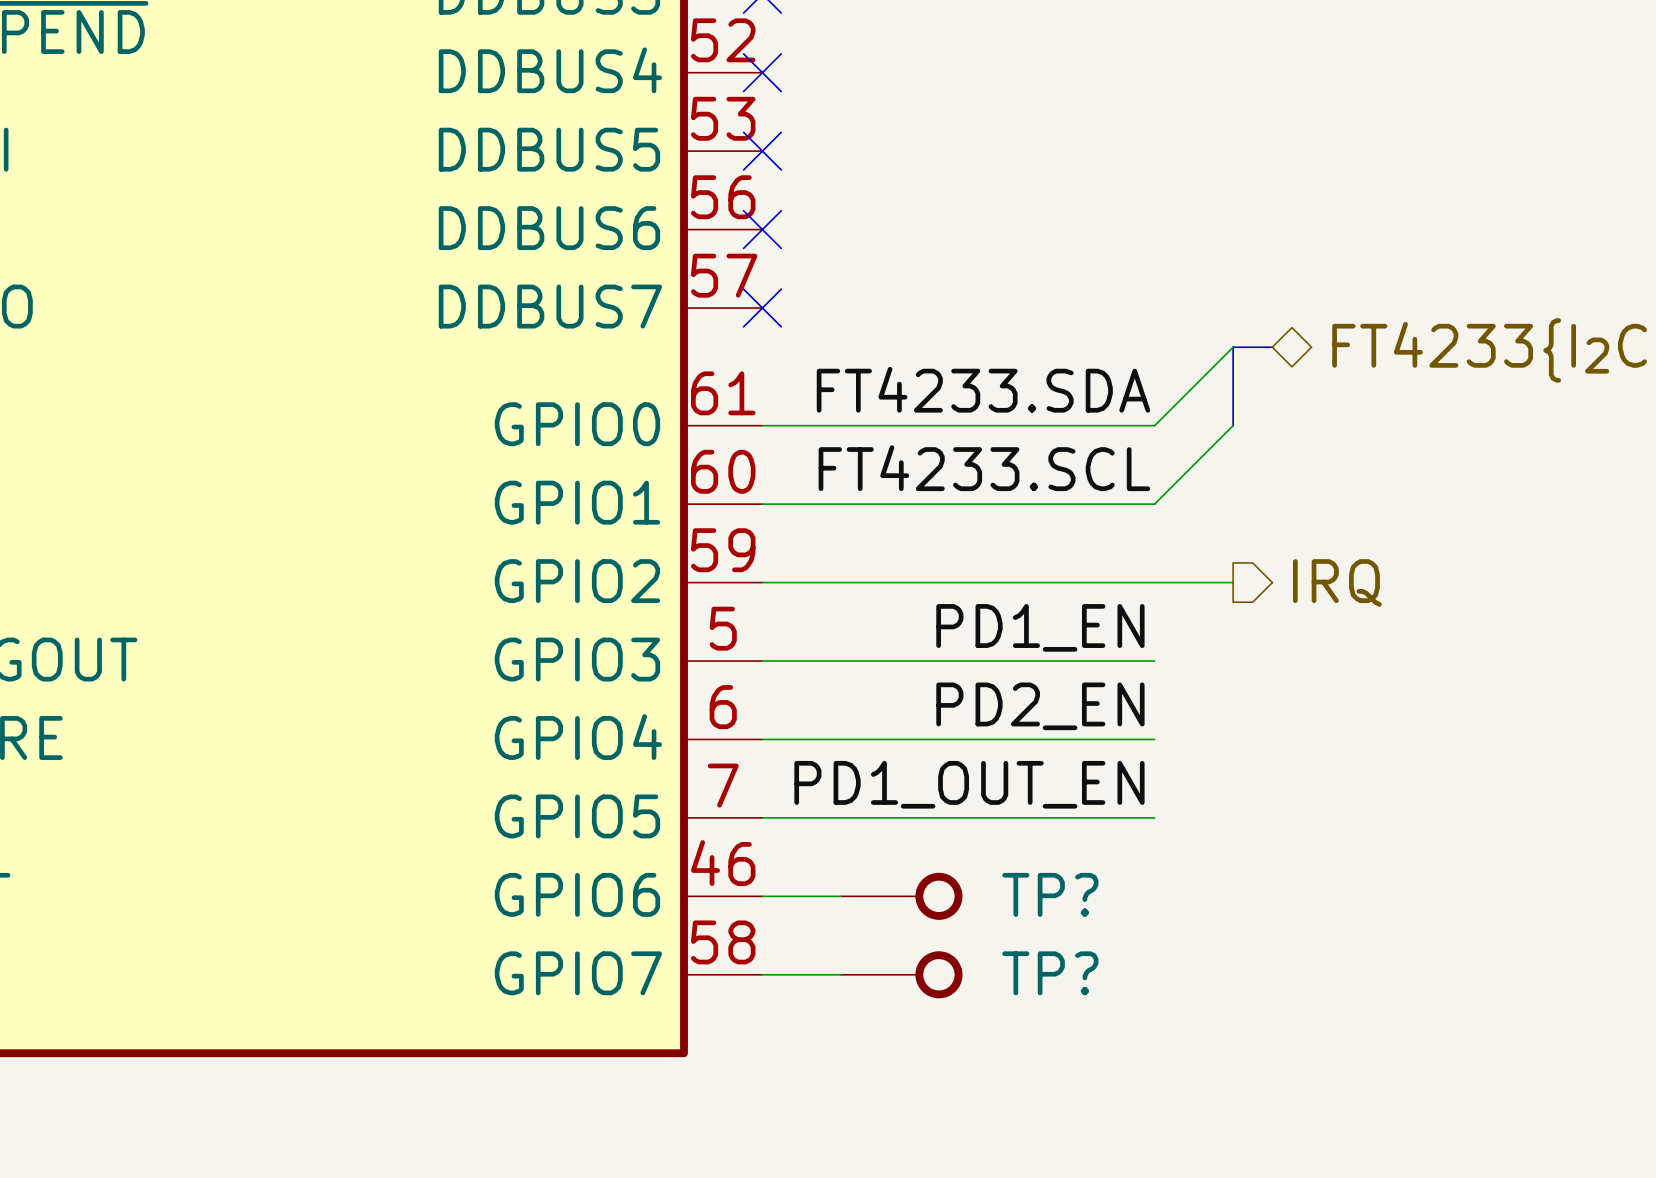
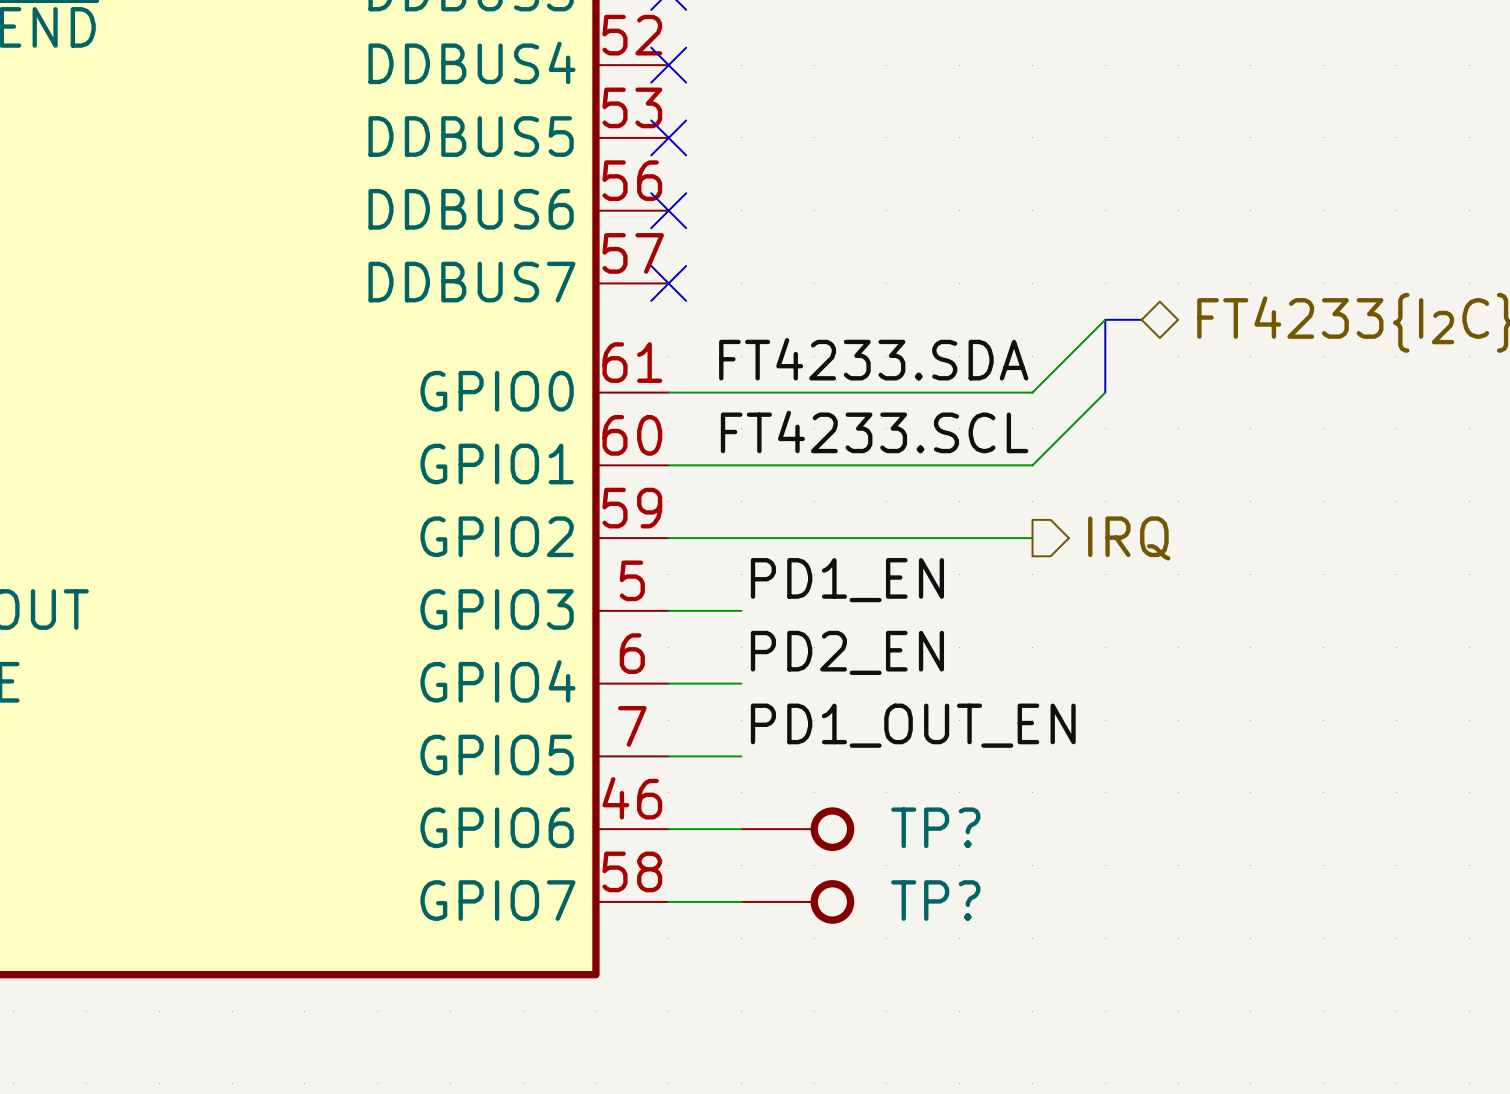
wire: (1154, 582) (1233, 582) -> none
hierarchical label position: IRQ (1337, 582) -> IRQ (1129, 538)
label position: PD1_EN (1040, 627) -> PD1_EN (847, 580)
wire: (840, 661) (1154, 661) -> none
label position: PD2_EN (1040, 706) -> PD2_EN (847, 652)
wire: (840, 739) (1154, 739) -> none
label position: PD1_OUT_EN (969, 784) -> PD1_OUT_EN (913, 725)
wire: (840, 817) (1154, 817) -> none

